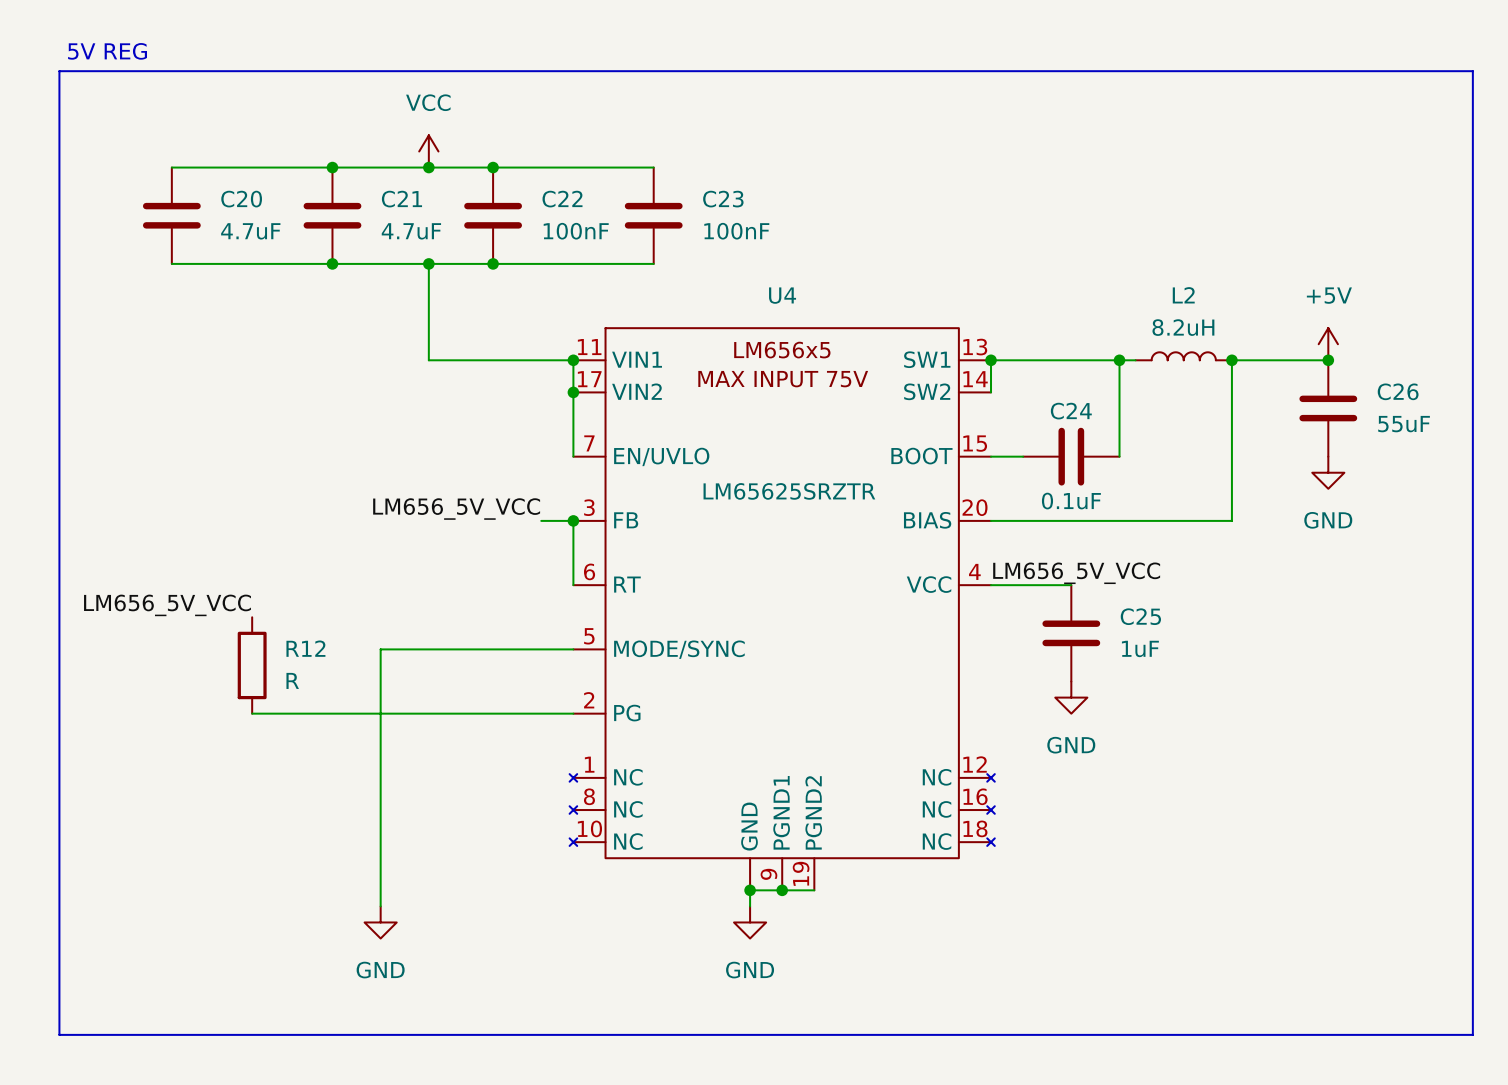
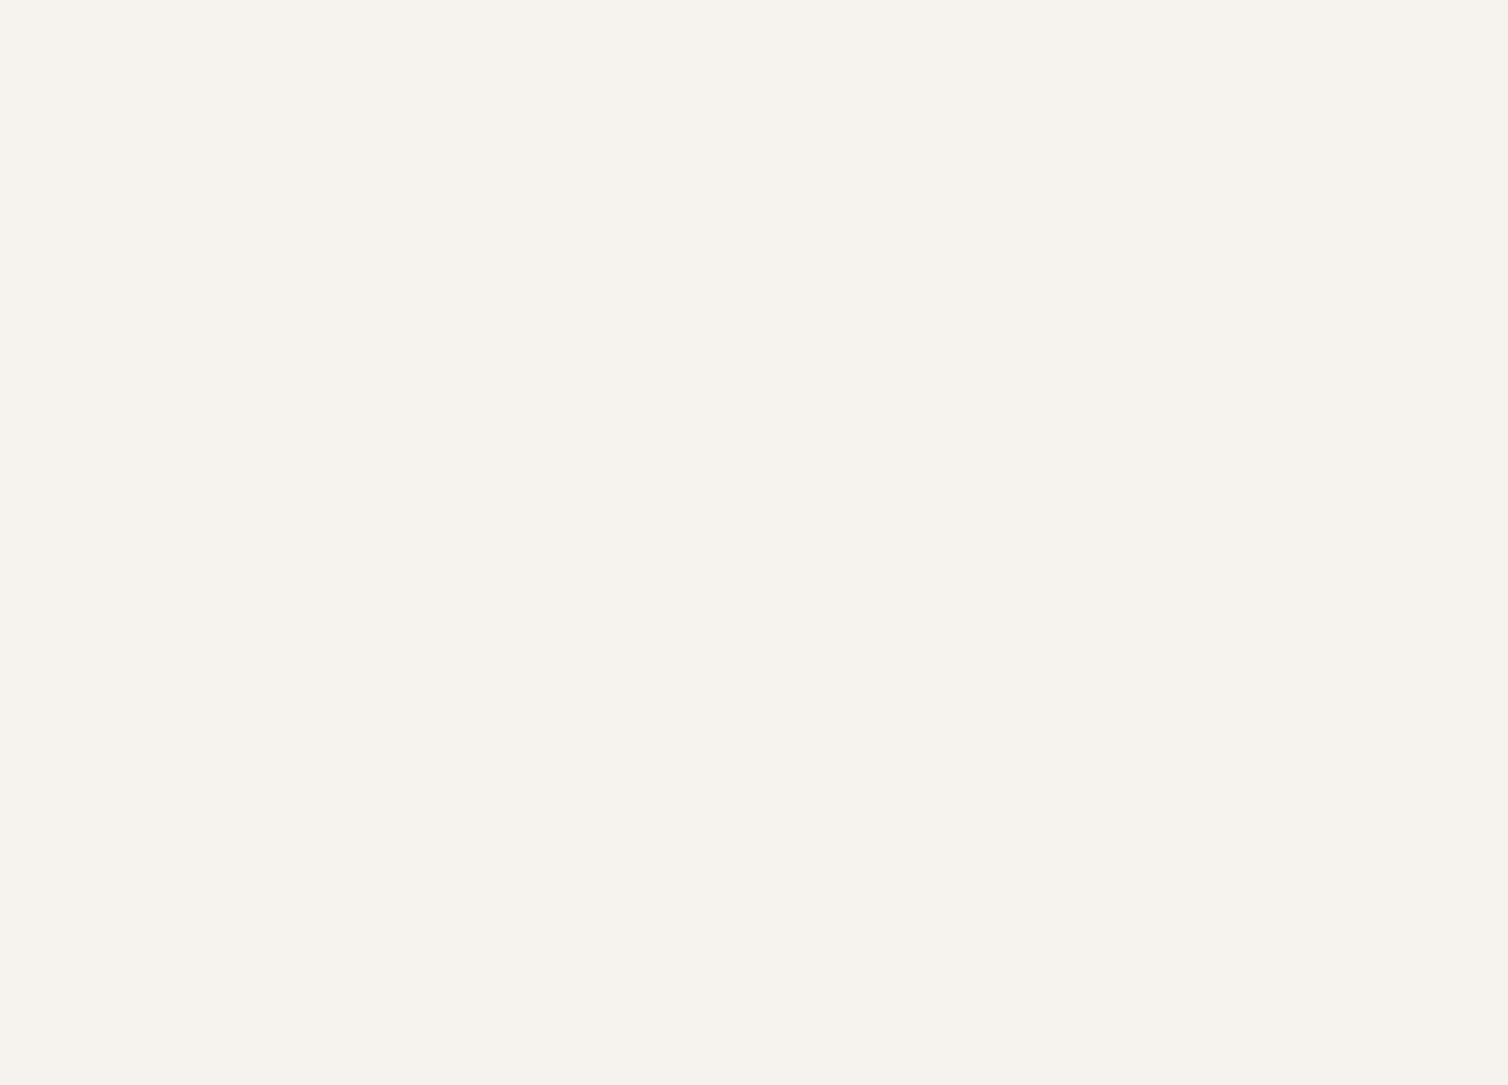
text: 5V REG (107, 51) -> none
line: (59, 71) (1472, 71) (1472, 1034) (59, 1034) (59, 71) -> none
power symbol: VCC (428, 151) -> none
wire: (171, 167) (653, 167) -> none
junction: (332, 167) -> none
junction: (428, 167) -> none
junction: (493, 167) -> none
C20: 4.7uF (171, 215) -> none
C21: 4.7uF (332, 215) -> none
C22: 100nF (493, 215) -> none
C23: 100nF (653, 215) -> none
wire: (171, 263) (653, 263) -> none
junction: (332, 263) -> none
wire: (428, 263) (428, 360) (573, 360) (573, 456) -> none
junction: (428, 263) -> none
junction: (493, 263) -> none
power symbol: +5V (1328, 344) -> none
L2: 8.2uH (1183, 356) -> none
junction: (573, 360) -> none
junction: (991, 360) -> none
wire: (1119, 360) (1119, 456) -> none
junction: (1119, 360) -> none
wire: (1135, 360) (991, 360) (991, 392) -> none
junction: (1231, 360) -> none
wire: (1328, 360) (1231, 360) (1231, 520) (991, 520) -> none
junction: (1328, 360) -> none
junction: (573, 392) -> none
C26: 55uF (1328, 408) -> none
wire: (991, 456) (1023, 456) -> none
C24: 0.1uF (1071, 456) -> none
power symbol: GND (1328, 472) -> none
label: LM656_5V_VCC (456, 509) -> none
wire: (541, 520) (573, 520) (573, 585) -> none
junction: (573, 520) -> none
label: LM656_5V_VCC (1076, 573) -> none
wire: (991, 585) (1071, 585) -> none
label: LM656_5V_VCC (167, 605) -> none
U4: LM65625SRZTR (782, 609) -> none
C25: 1uF (1071, 633) -> none
wire: (573, 649) (380, 649) (380, 906) -> none
R12: R (252, 665) -> none
power symbol: GND (1071, 697) -> none
wire: (252, 713) (573, 713) -> none
junction: (750, 890) -> none
junction: (782, 890) -> none
wire: (814, 890) (750, 890) (750, 906) -> none
power symbol: GND (380, 922) -> none
power symbol: GND (750, 922) -> none

